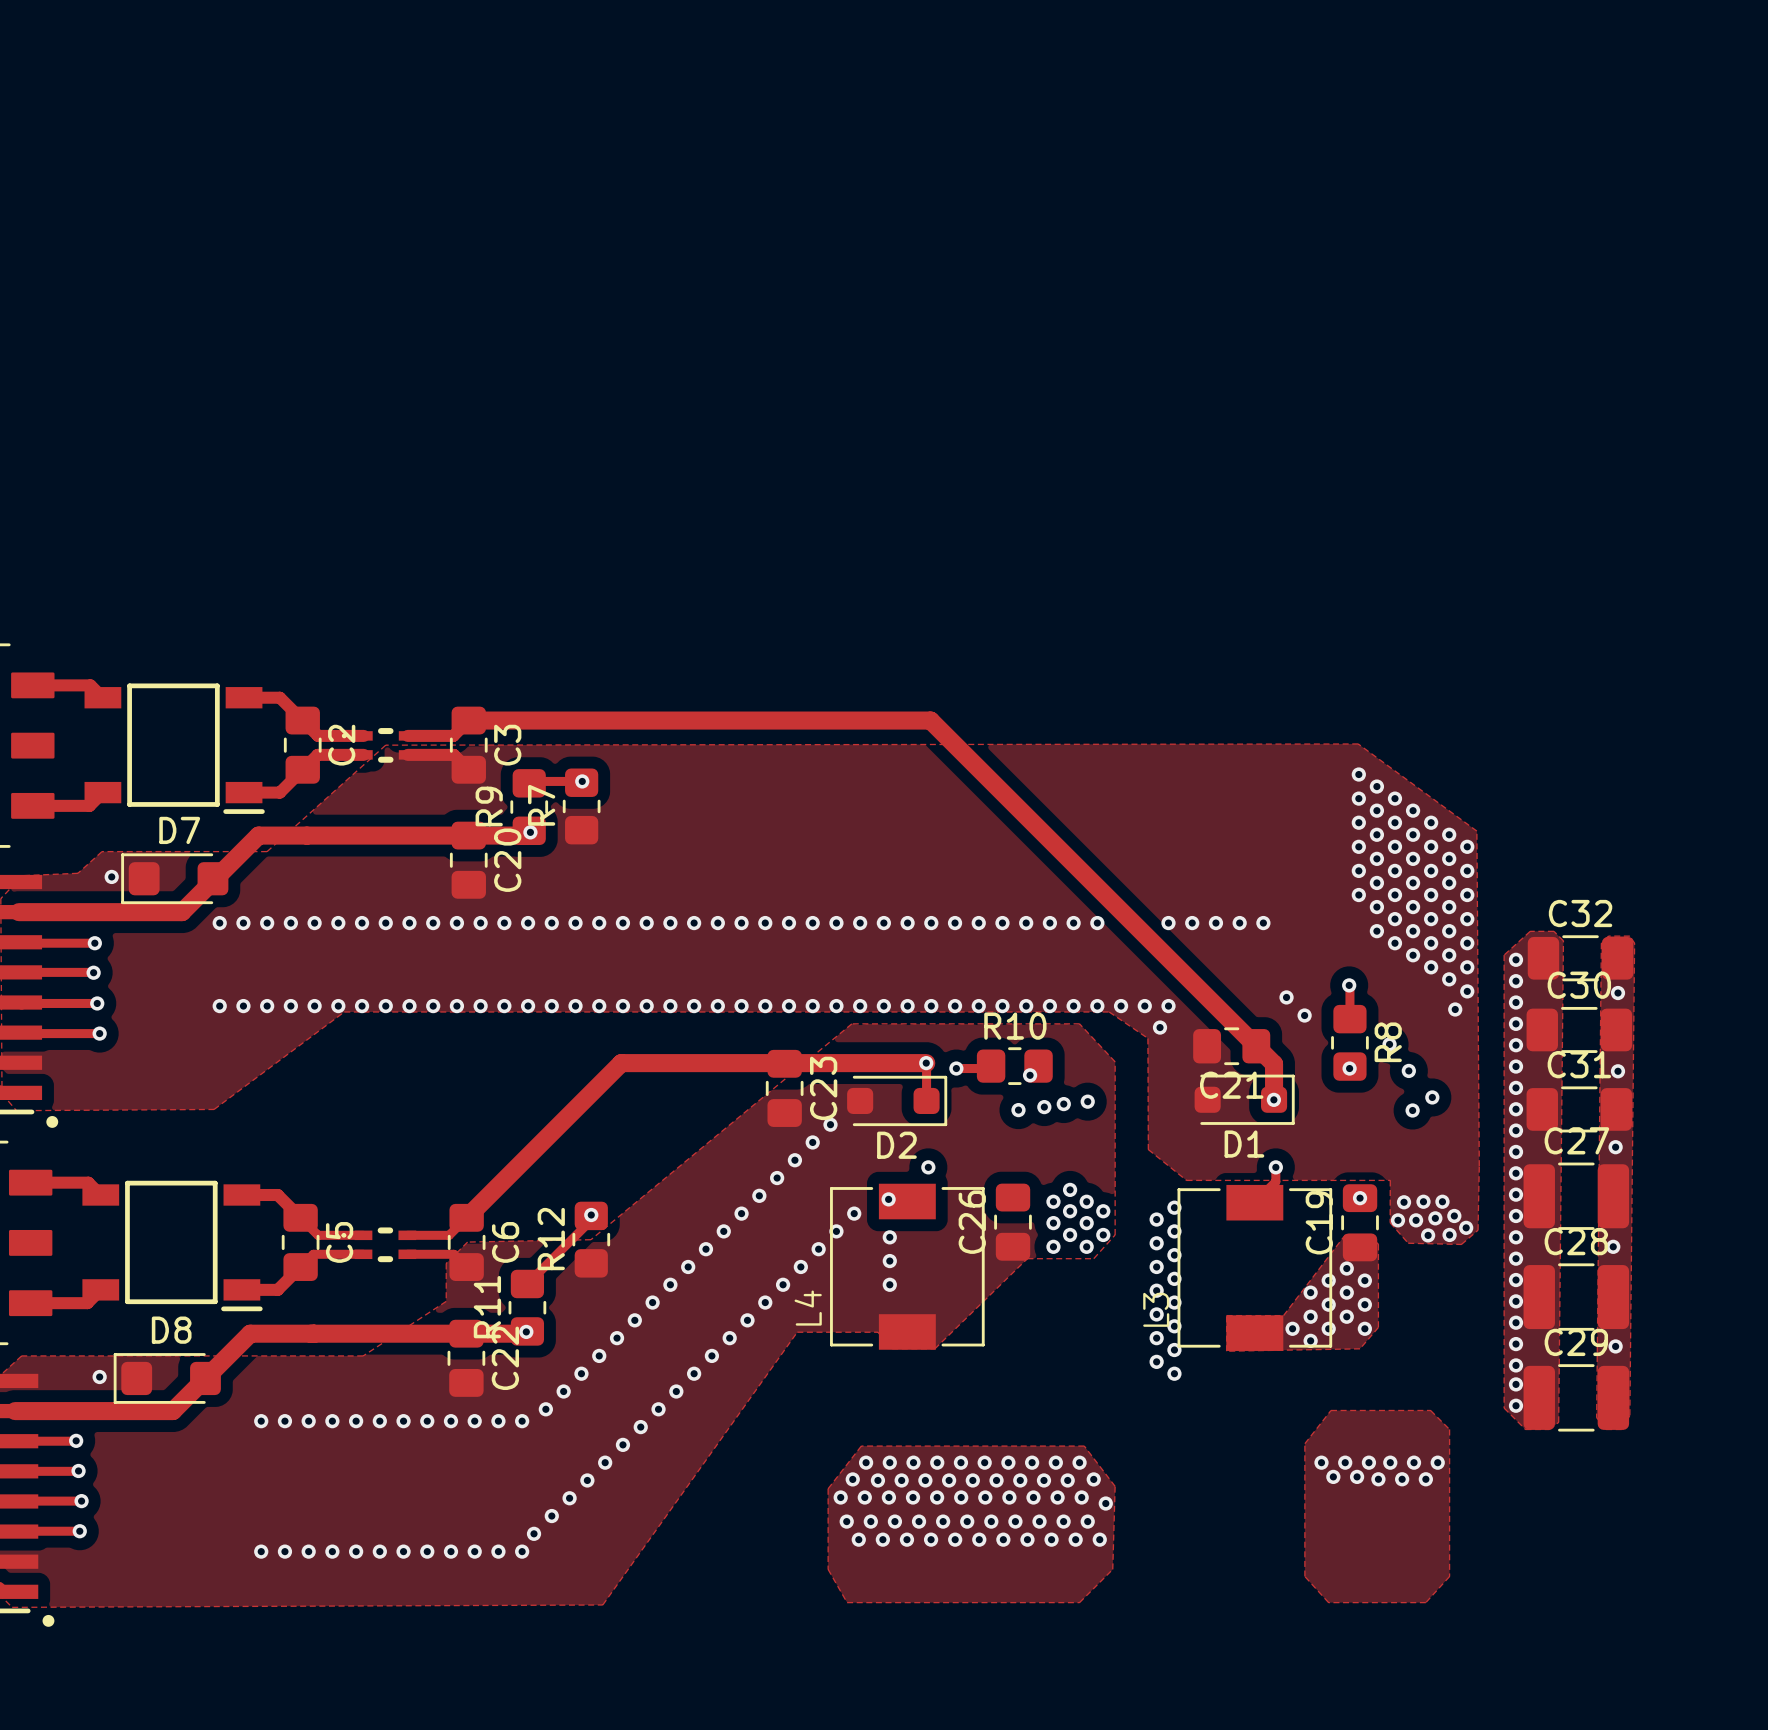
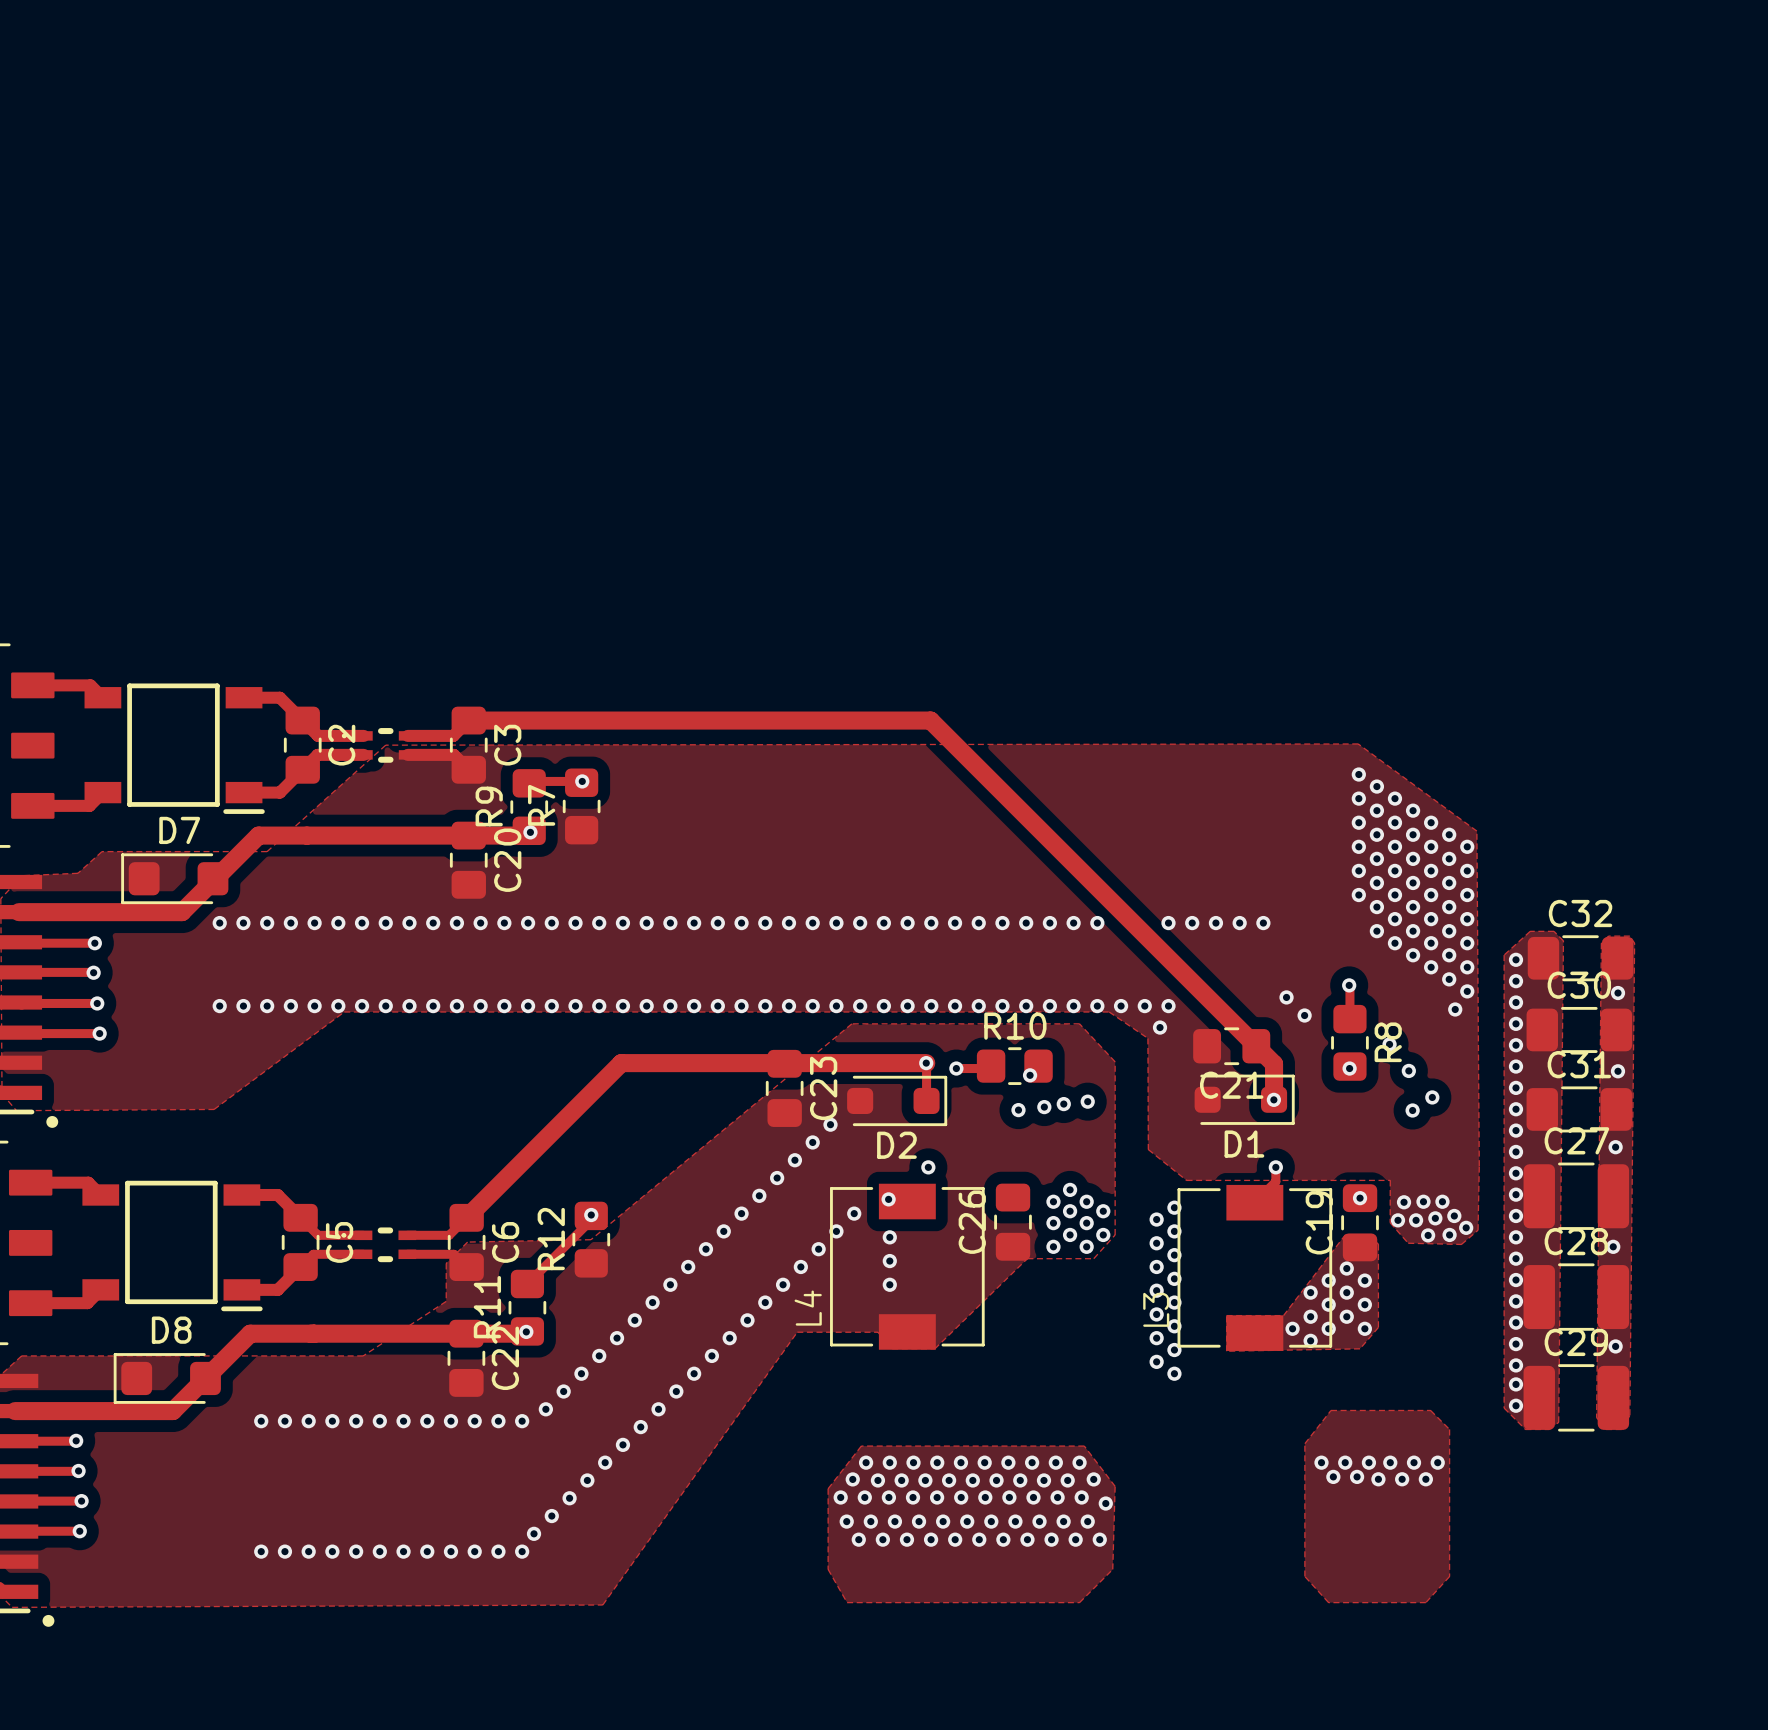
via: (111, 876) -> none
via: (99, 1377) -> none

